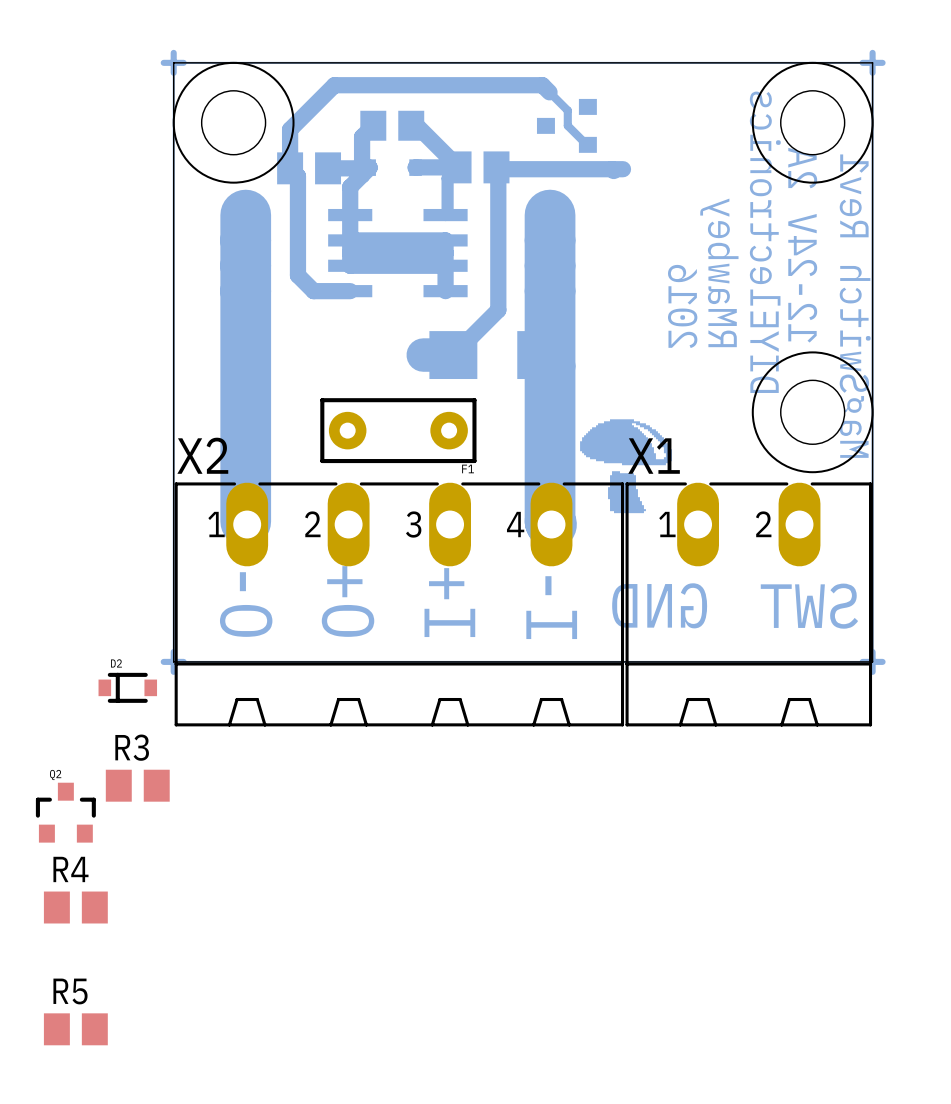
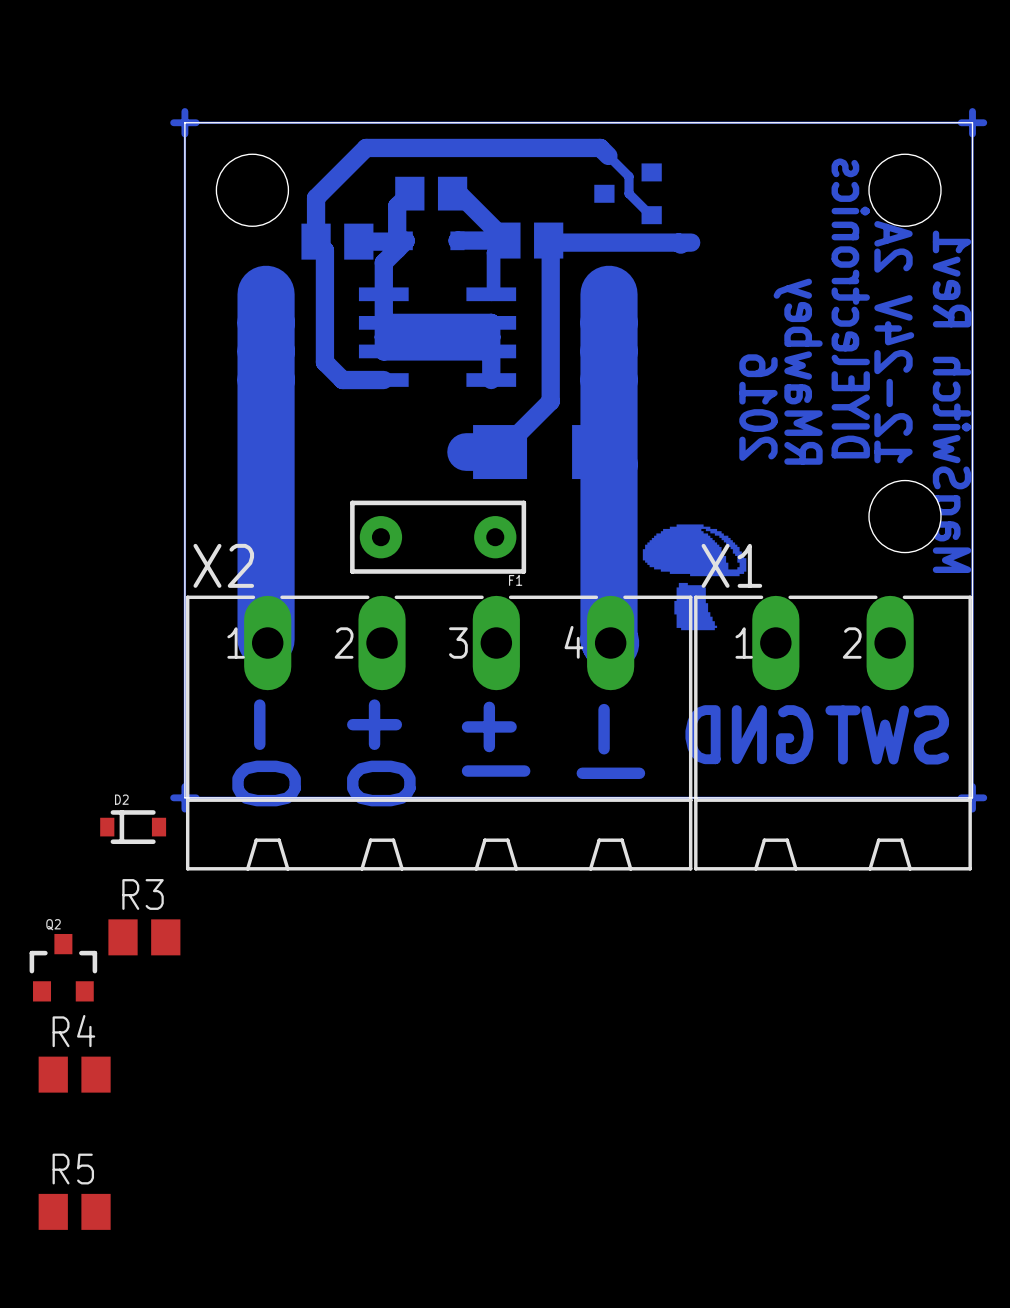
round board edge: [172, 61, 295, 184] -> none
round board edge: [751, 61, 874, 184] -> none
round board edge: [751, 351, 874, 474] -> none

